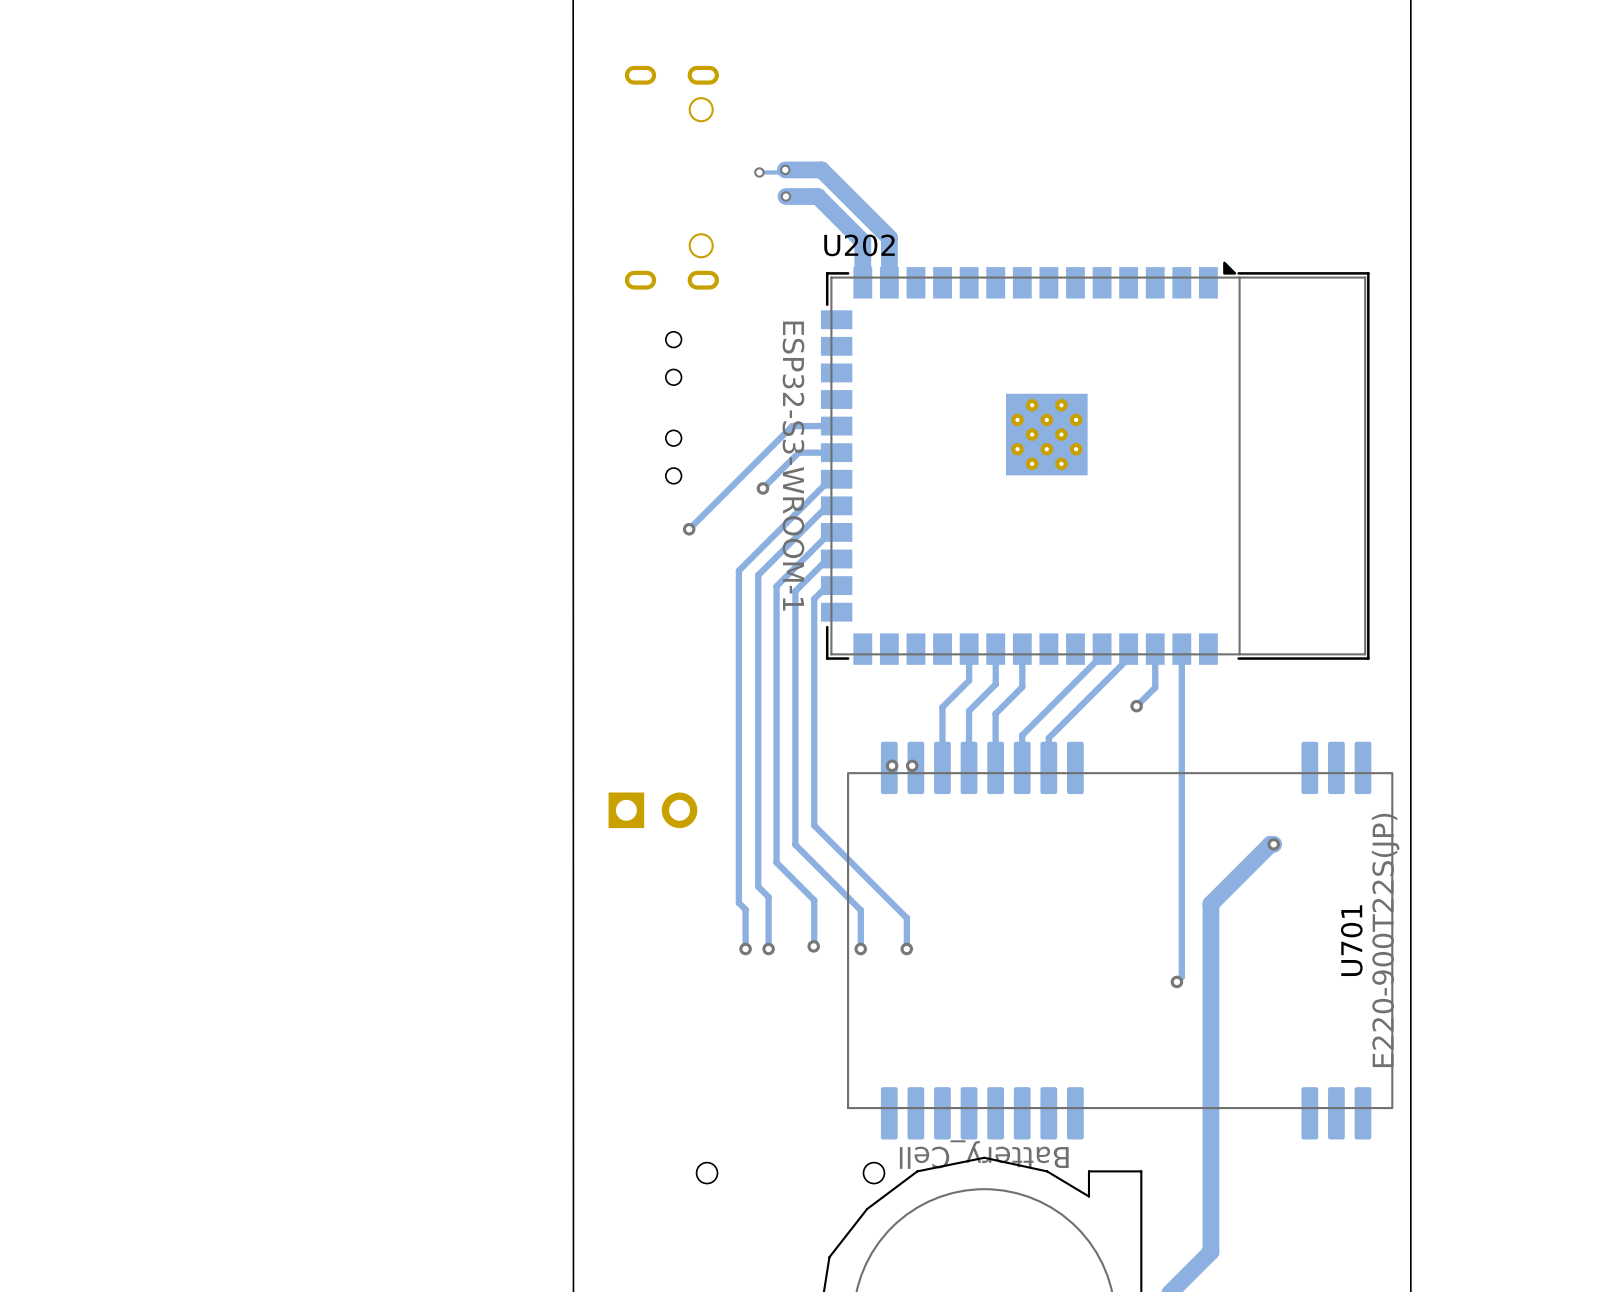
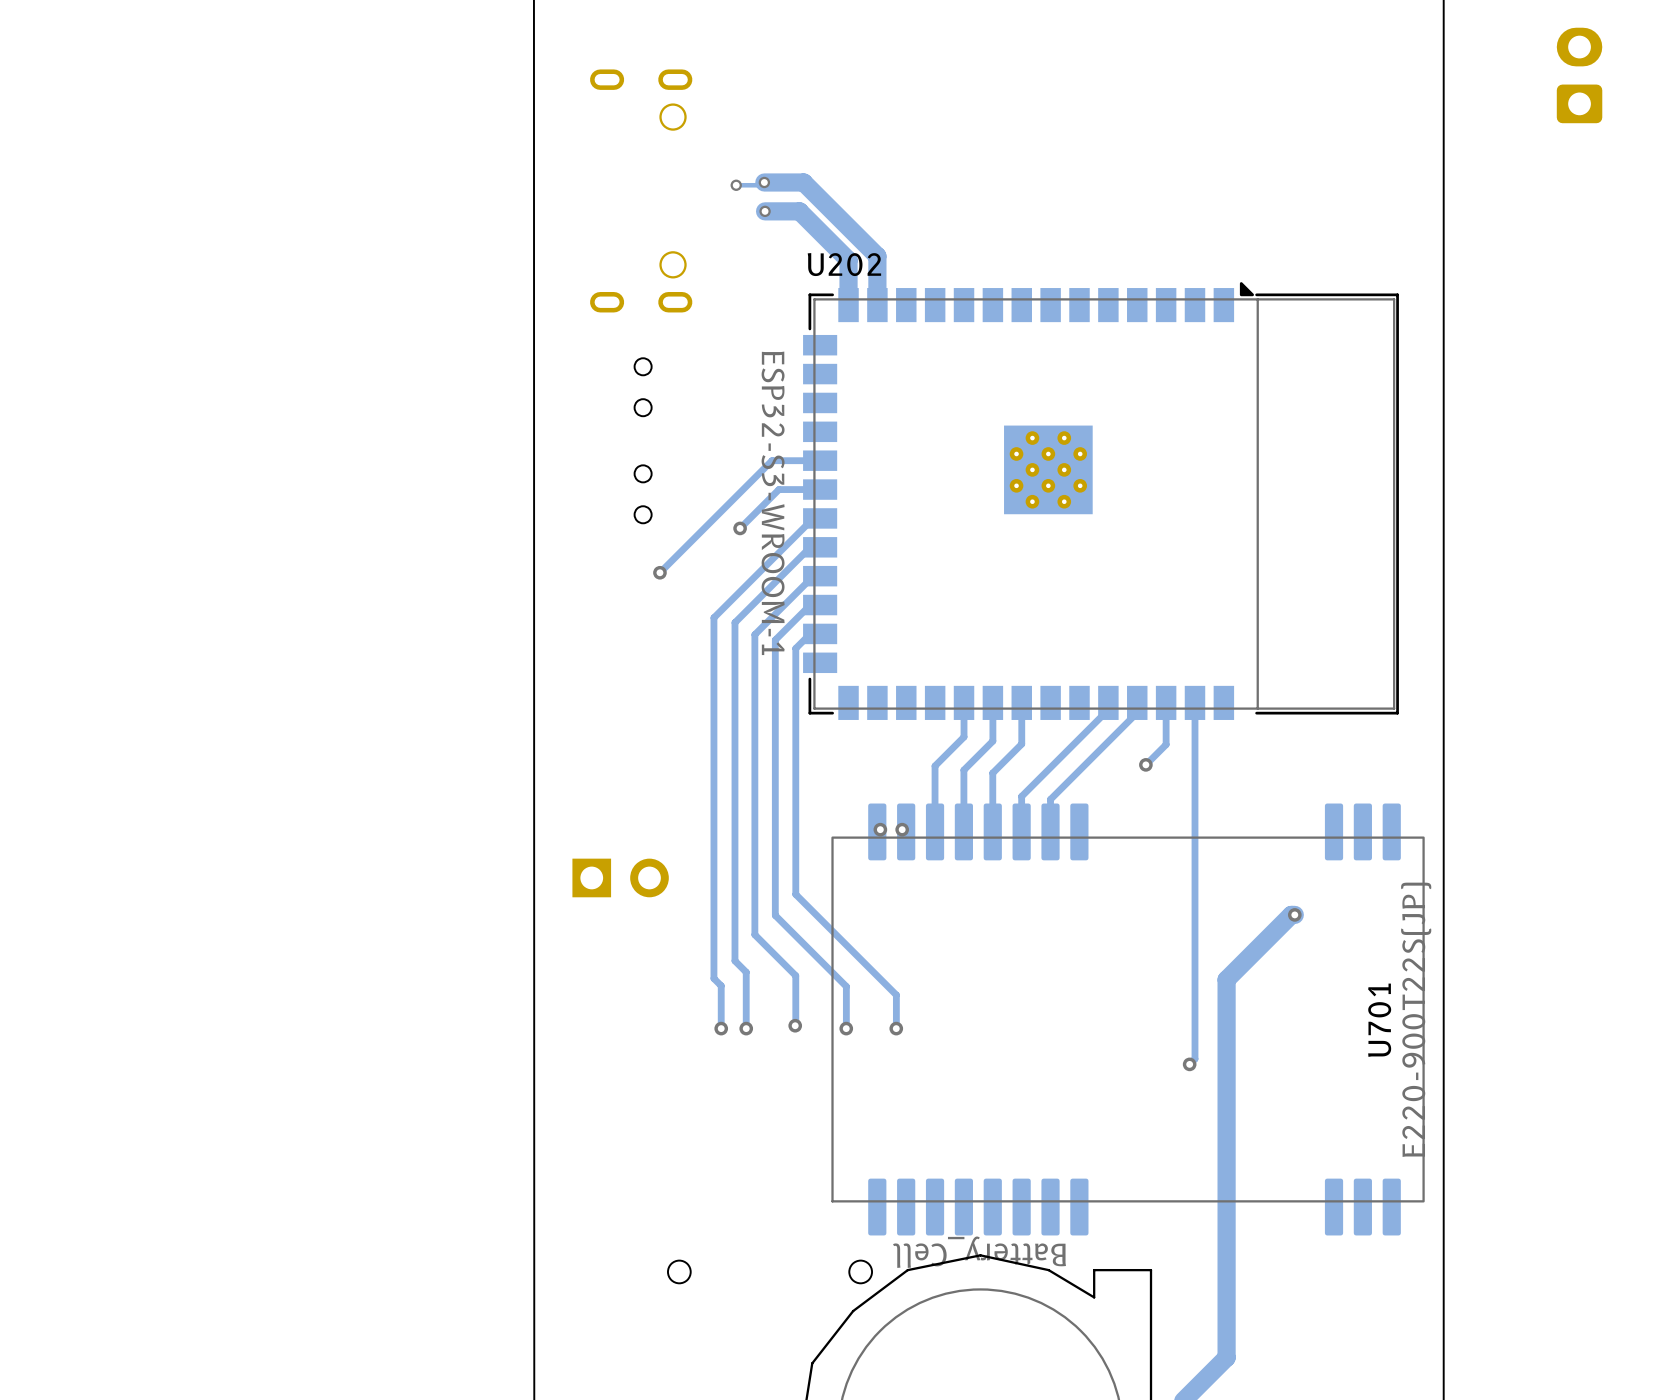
part: none -> (1579, 75)

